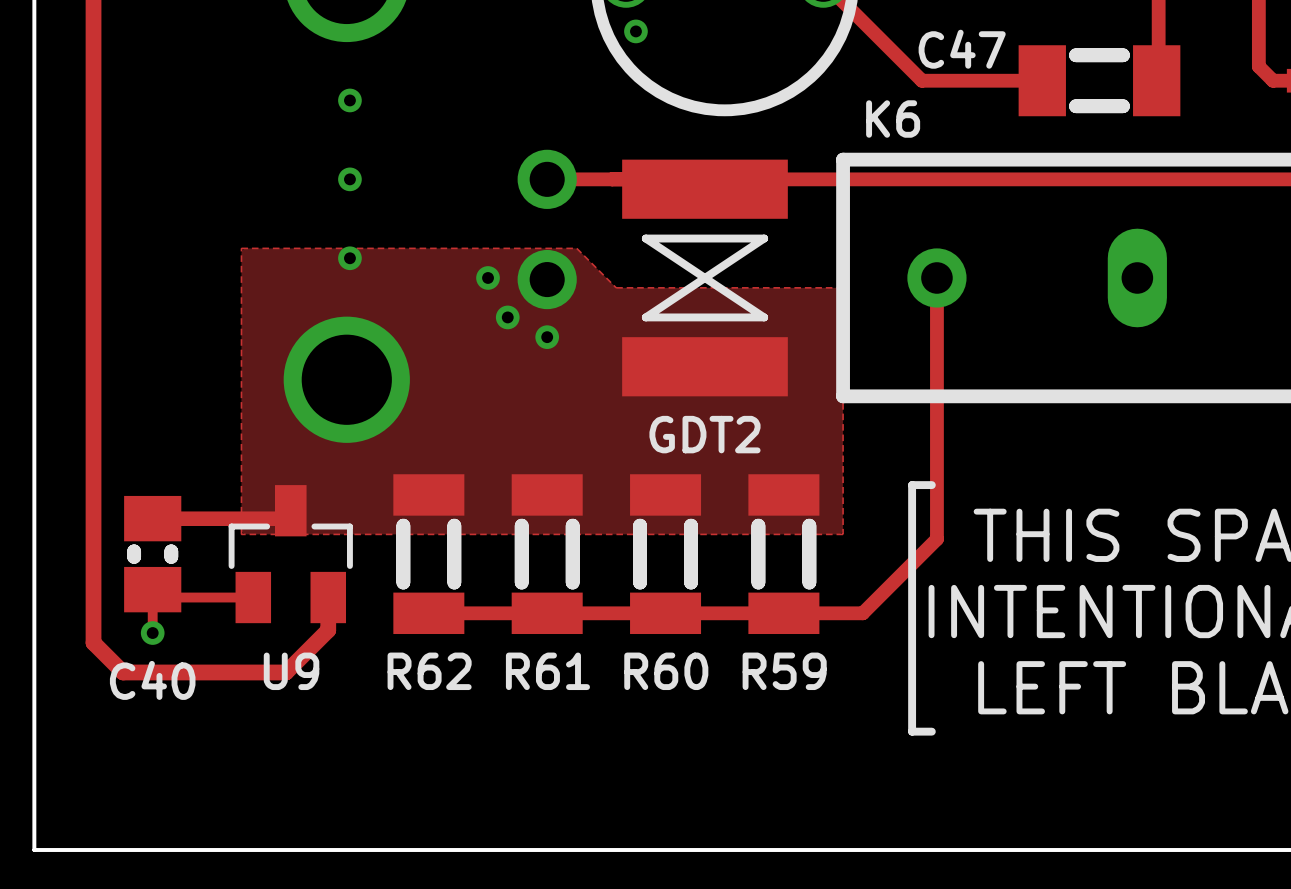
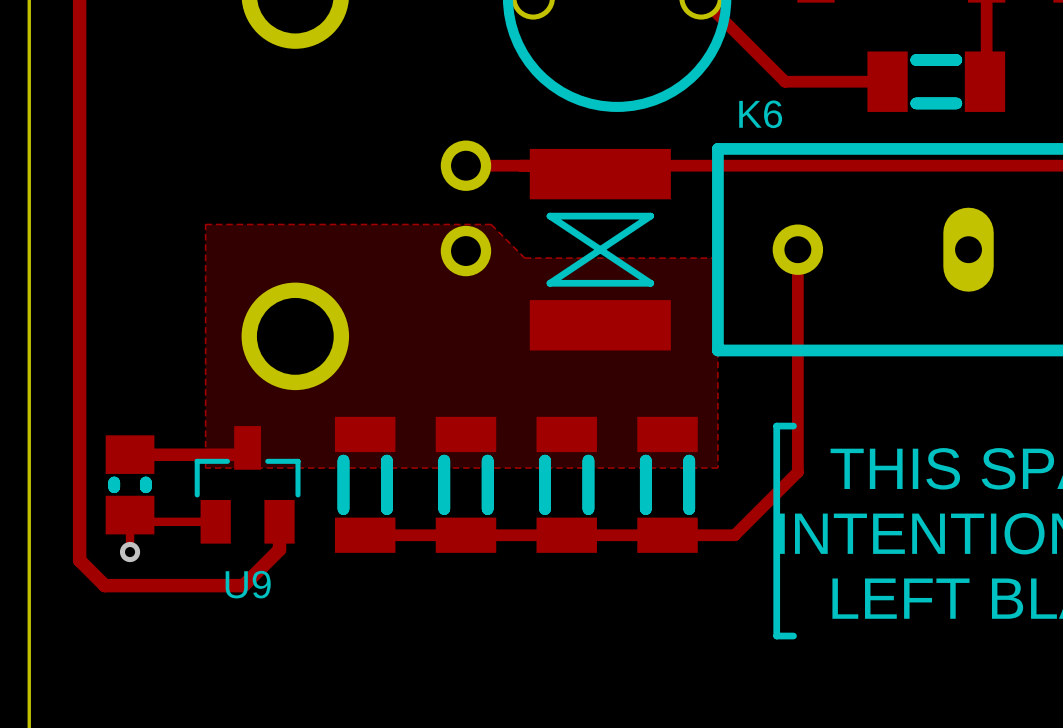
via: (635, 31) -> none
C47 name: C47 (962, 49) -> none
via: (349, 100) -> none
via: (349, 179) -> none
via: (349, 258) -> none
via: (488, 277) -> none
via: (507, 317) -> none
via: (547, 337) -> none
GDT2 name: GDT2 (704, 434) -> none
R62 name: R62 (429, 671) -> none
R61 name: R61 (547, 671) -> none
R60 name: R60 (666, 671) -> none
R59 name: R59 (784, 671) -> none
C40 name: C40 (152, 680) -> none

